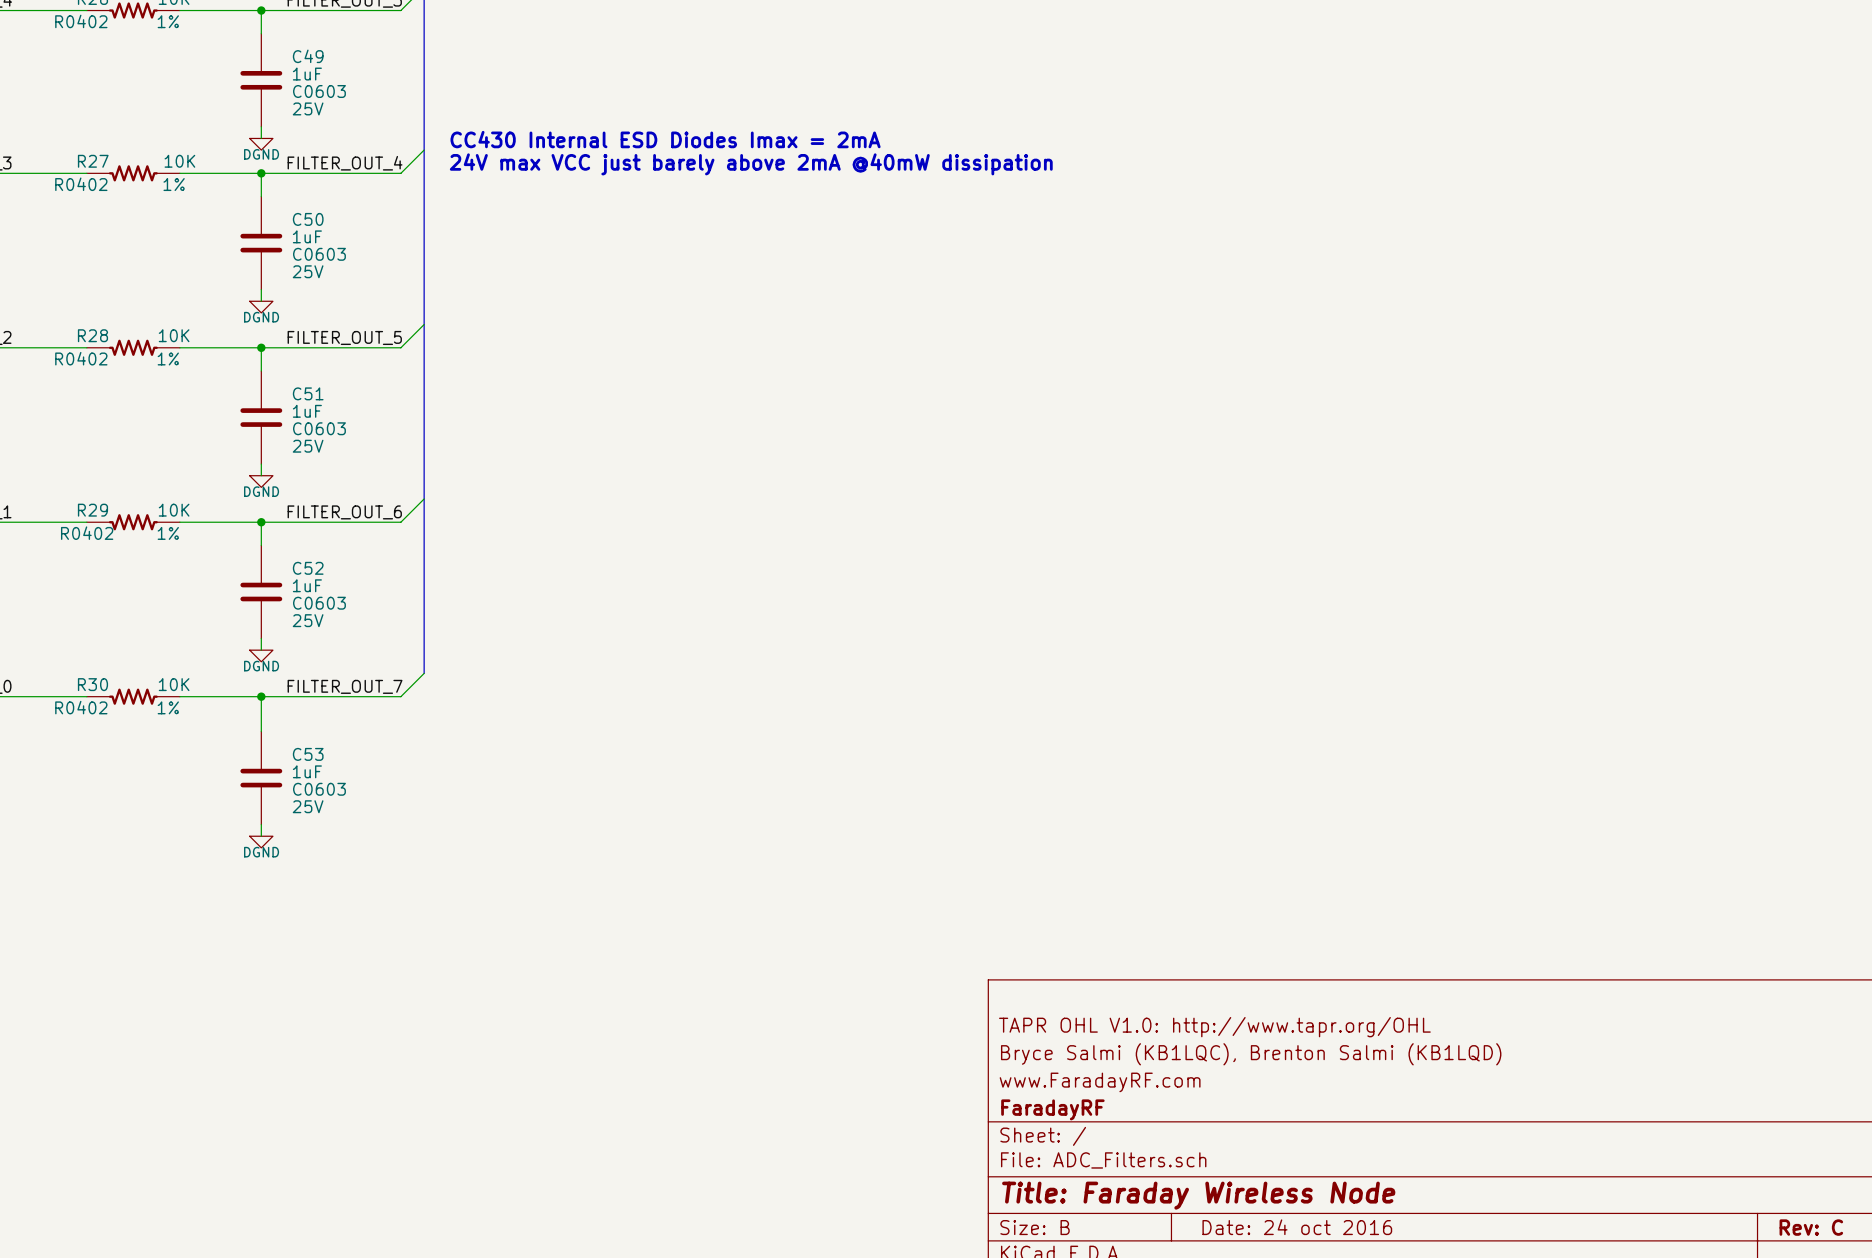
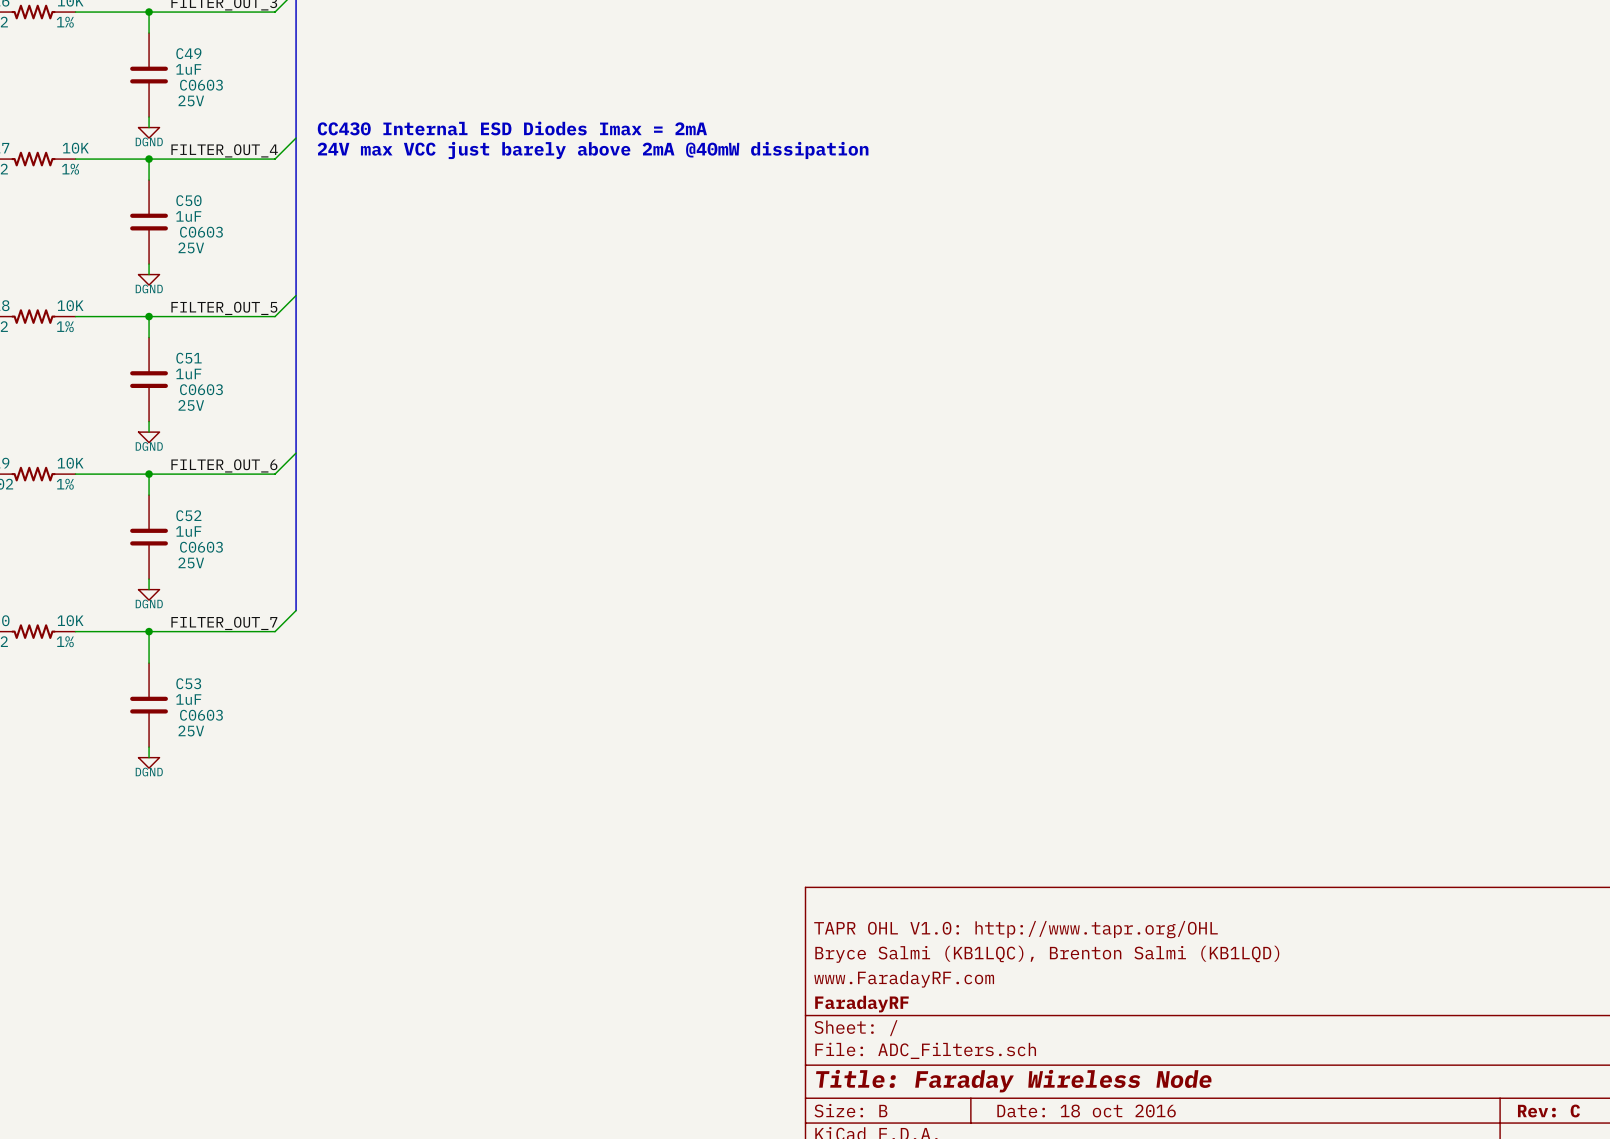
title block: Date: 24 oct 2016 (1297, 1227) -> Date: 18 oct 2016 (1086, 1111)

